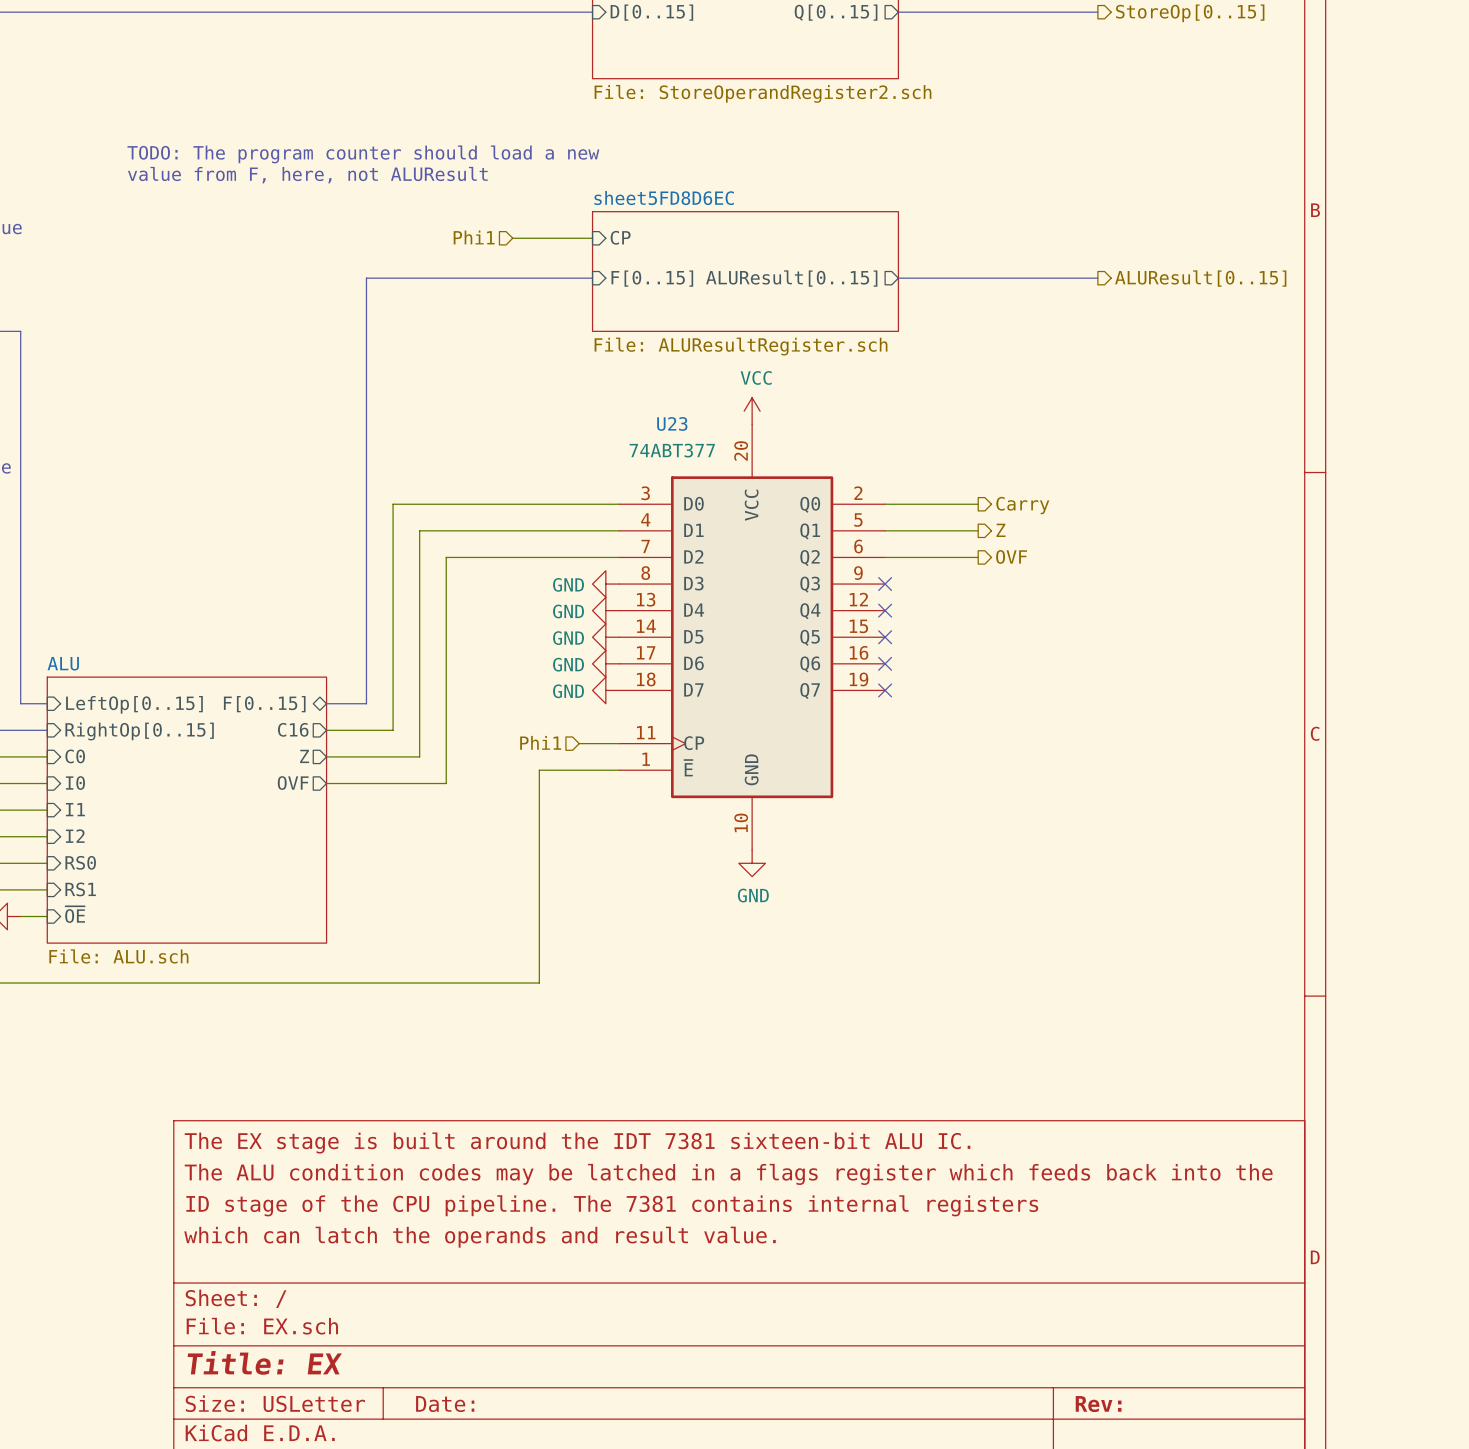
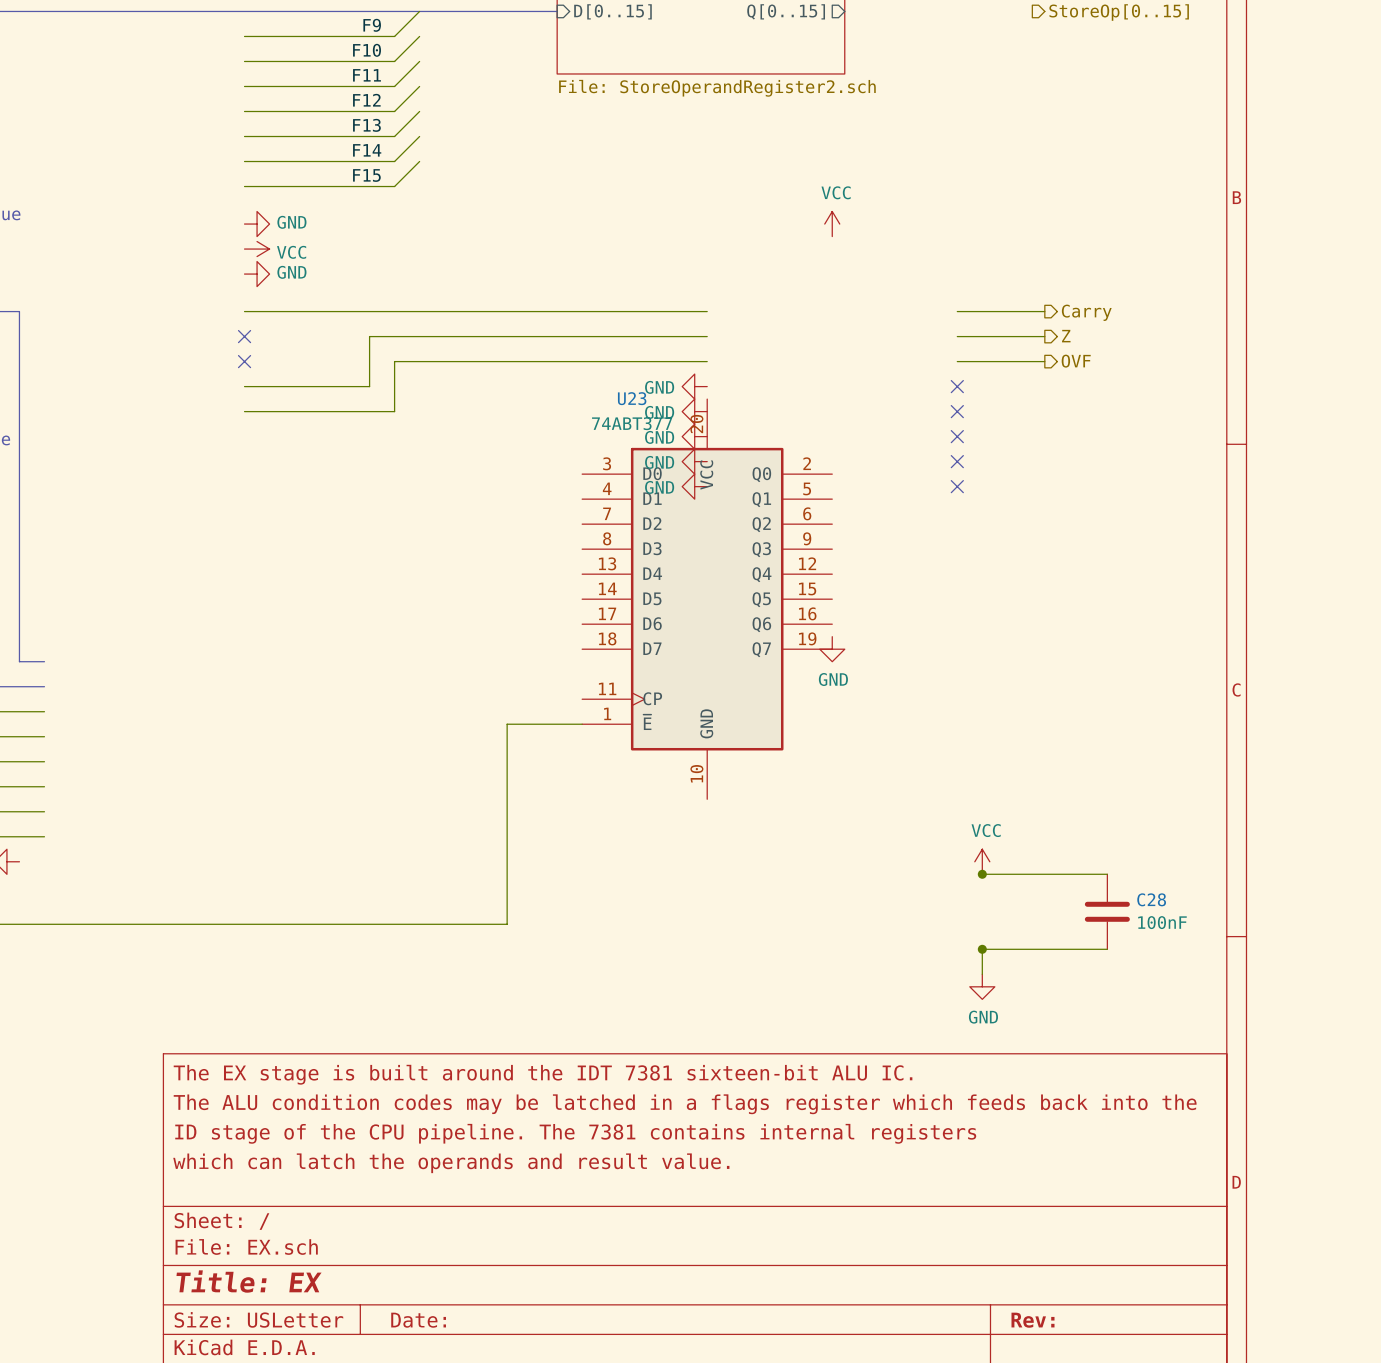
wire: none -> (419, 11) (394, 36) (244, 36)
bus: (898, 12) (1097, 12) -> none
label: none -> F9 (372, 25)
wire: none -> (419, 36) (394, 61) (244, 61)
label: none -> F10 (367, 50)
wire: none -> (419, 61) (394, 86) (244, 86)
label: none -> F11 (366, 75)
wire: none -> (419, 86) (394, 111) (244, 111)
label: none -> F12 (366, 100)
wire: none -> (419, 111) (394, 136) (244, 136)
label: none -> F13 (366, 125)
wire: none -> (419, 136) (394, 161) (244, 161)
text: TODO: The program counter should load a new (363, 154) -> none
label: none -> F14 (367, 150)
wire: none -> (419, 161) (394, 186) (244, 186)
text: value from F, here, not ALUResult (307, 175) -> none
label: none -> F15 (366, 175)
hierarchical label: Phi1 (474, 237) -> none
sheet pin: CP (620, 237) -> none
power symbol: none -> GND (257, 224)
wire: (512, 238) (592, 238) -> none
power symbol: none -> VCC (257, 249)
sheet sheet5FD8D6EC: File: ALUResultRegister.sch (745, 271) -> none
bus: (592, 278) (366, 278) (366, 703) (326, 703) -> none
sheet pin: F[0..15] (652, 278) -> none
sheet pin: ALUResult[0..15] (791, 278) -> none
bus: (898, 278) (1097, 278) -> none
hierarchical label: ALUResult[0..15] (1200, 278) -> none
power symbol: none -> GND (257, 274)
wire: none -> (244, 311) (707, 311)
no-connect mark: none -> (244, 336)
wire: none -> (707, 336) (369, 336) (369, 386) (244, 386)
no-connect mark: none -> (244, 361)
wire: none -> (707, 361) (394, 361) (394, 411) (244, 411)
power symbol: none -> GND (694, 386)
power symbol position: VCC (752, 411) -> VCC (832, 224)
no-connect mark: none -> (957, 386)
power symbol: none -> GND (694, 411)
no-connect mark: none -> (957, 411)
power symbol: none -> GND (694, 436)
no-connect mark: none -> (957, 436)
power symbol: none -> GND (694, 461)
no-connect mark: none -> (957, 461)
wire: (619, 504) (393, 504) (393, 730) (326, 730) -> none
wire: (885, 504) (978, 504) -> (957, 311) (1044, 311)
hierarchical label position: Carry (1022, 505) -> Carry (1086, 312)
power symbol: none -> GND (694, 486)
no-connect mark: none -> (957, 486)
wire: (619, 530) (419, 530) (419, 756) (326, 756) -> none
wire: (885, 530) (978, 530) -> (957, 336) (1044, 336)
hierarchical label position: Z (1001, 530) -> Z (1066, 336)
hierarchical label position: OVF (1011, 556) -> OVF (1076, 361)
wire: (619, 557) (446, 557) (446, 783) (326, 783) -> none
wire: (885, 557) (978, 557) -> (957, 361) (1044, 361)
power symbol: GND (605, 584) -> none
no-connect mark: (885, 584) -> none
power symbol: GND (605, 610) -> none
no-connect mark: (885, 610) -> none
power symbol: GND (605, 637) -> none
no-connect mark: (885, 637) -> none
power symbol: GND (605, 663) -> none
no-connect mark: (885, 663) -> none
power symbol: GND (605, 690) -> none
no-connect mark: (885, 690) -> none
power symbol: none -> GND (832, 649)
sheet pin: LeftOp[0..15] (134, 704) -> none
sheet pin: F[0..15] (264, 704) -> none
sheet pin: C16 (293, 729) -> none
sheet pin: RightOp[0..15] (139, 731) -> none
hierarchical label: Phi1 (540, 742) -> none
wire: (579, 743) (619, 743) -> none
sheet pin: C0 (75, 756) -> none
sheet pin: Z (304, 756) -> none
sheet pin: I0 (75, 783) -> none
sheet pin: OVF (293, 783) -> none
sheet pin: I1 (75, 809) -> none
sheet ALU: File: ALU.sch (186, 810) -> none
sheet pin: I2 (75, 836) -> none
sheet pin: RS0 (80, 862) -> none
power symbol: GND (752, 863) -> none
sheet pin: RS1 (80, 889) -> none
sheet pin: ~{OE} (75, 914) -> none
wire: (20, 916) (47, 916) -> none
power symbol: none -> VCC (982, 861)
wire: none -> (982, 874) (1107, 874)
junction: none -> (982, 874)
C28: none -> 100nF (1107, 911)
junction: none -> (982, 949)
wire: none -> (1107, 949) (982, 949) (982, 974)
power symbol: none -> GND (982, 986)

